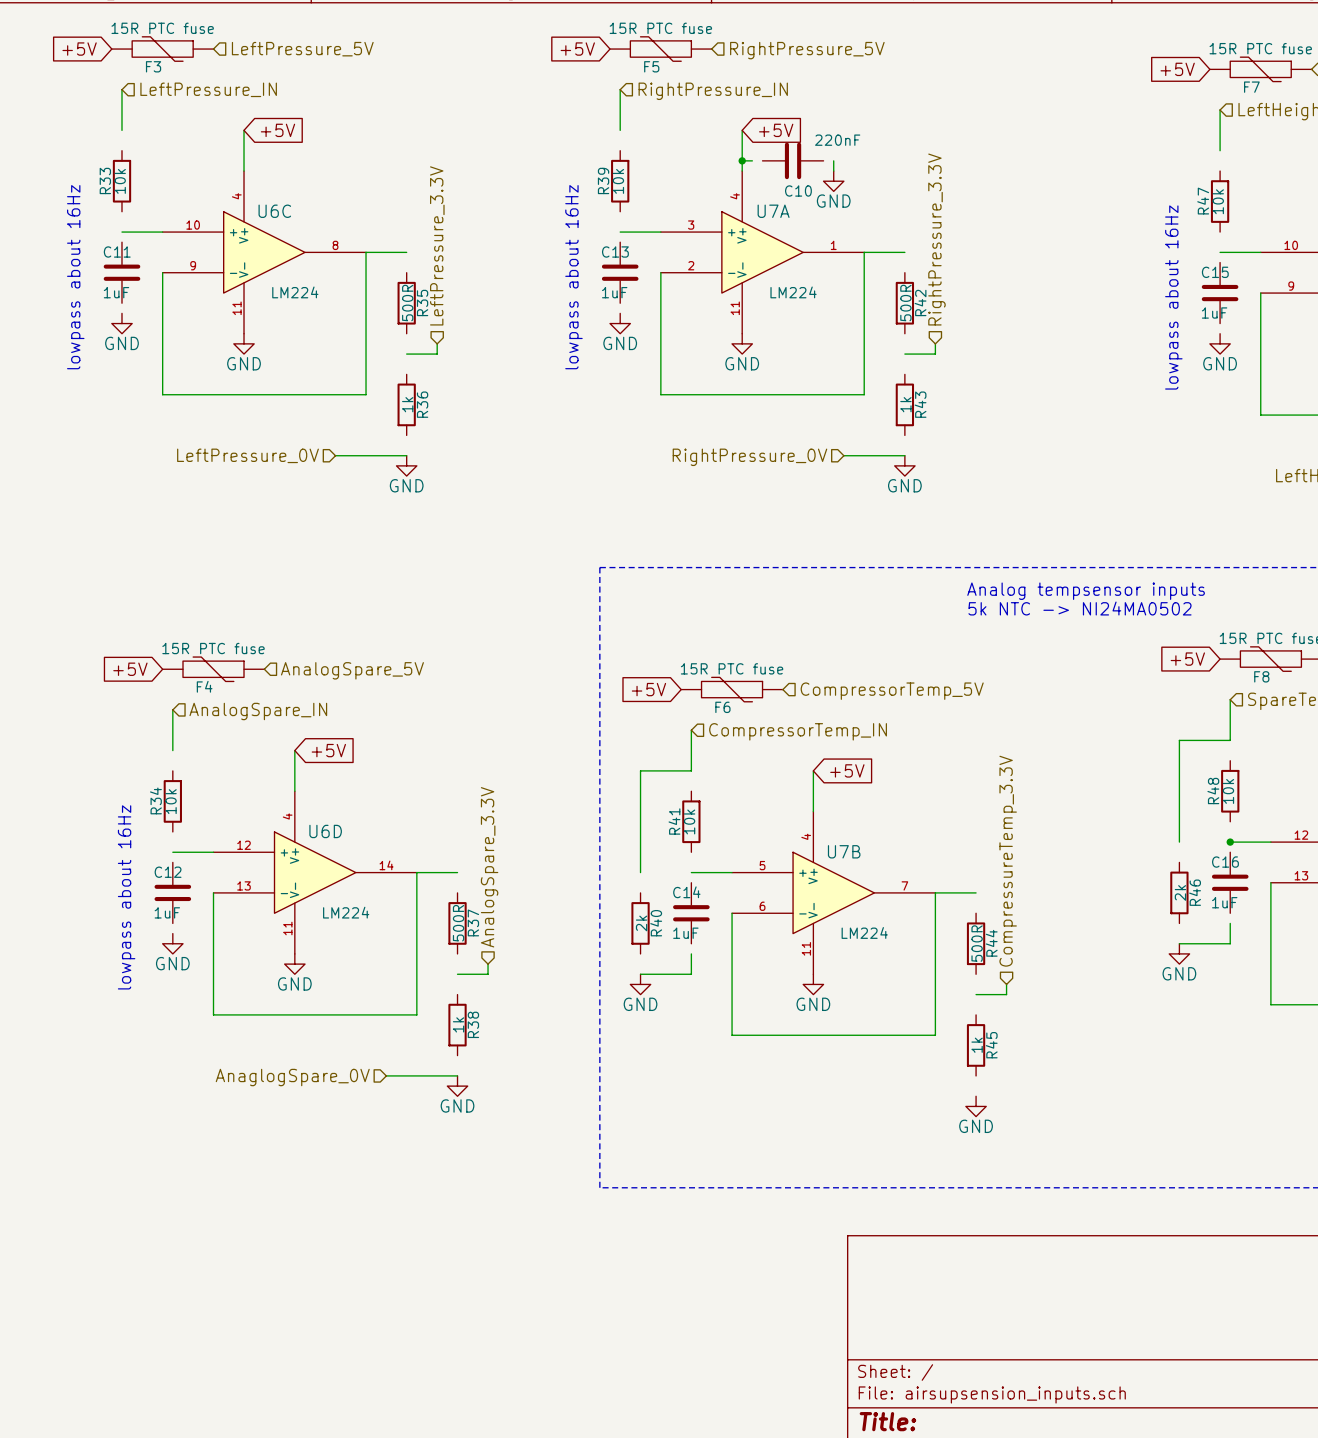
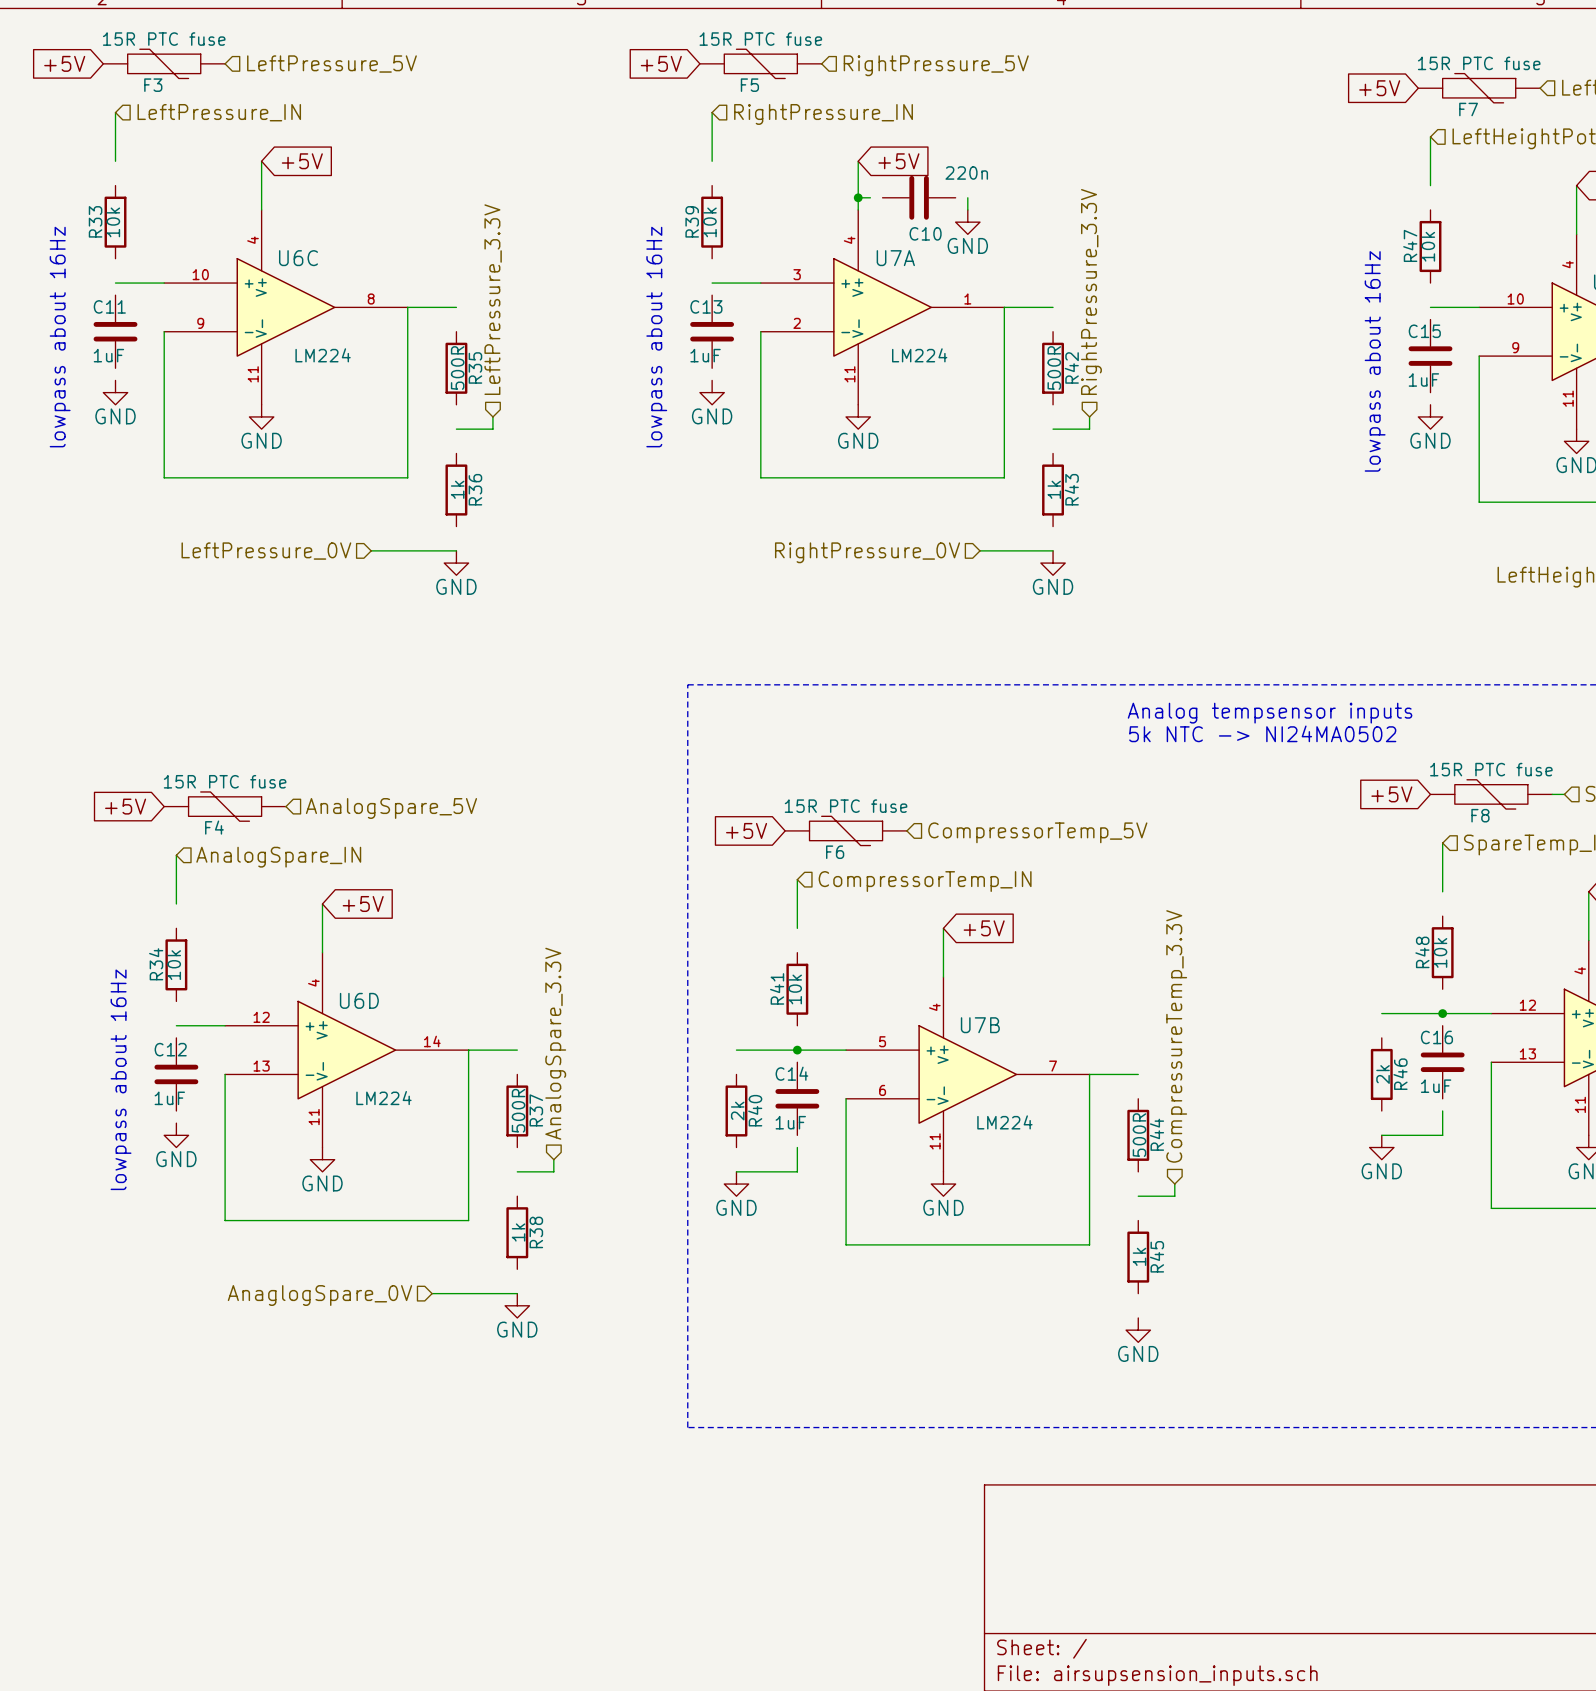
C10 value: 220nF (837, 140) -> 220n (966, 172)
wire: (1230, 740) (1179, 740) (1179, 842) -> (1442, 1013) (1381, 1013)
wire: (691, 770) (640, 770) (640, 872) -> (797, 1050) (736, 1050)
junction: none -> (797, 1050)

